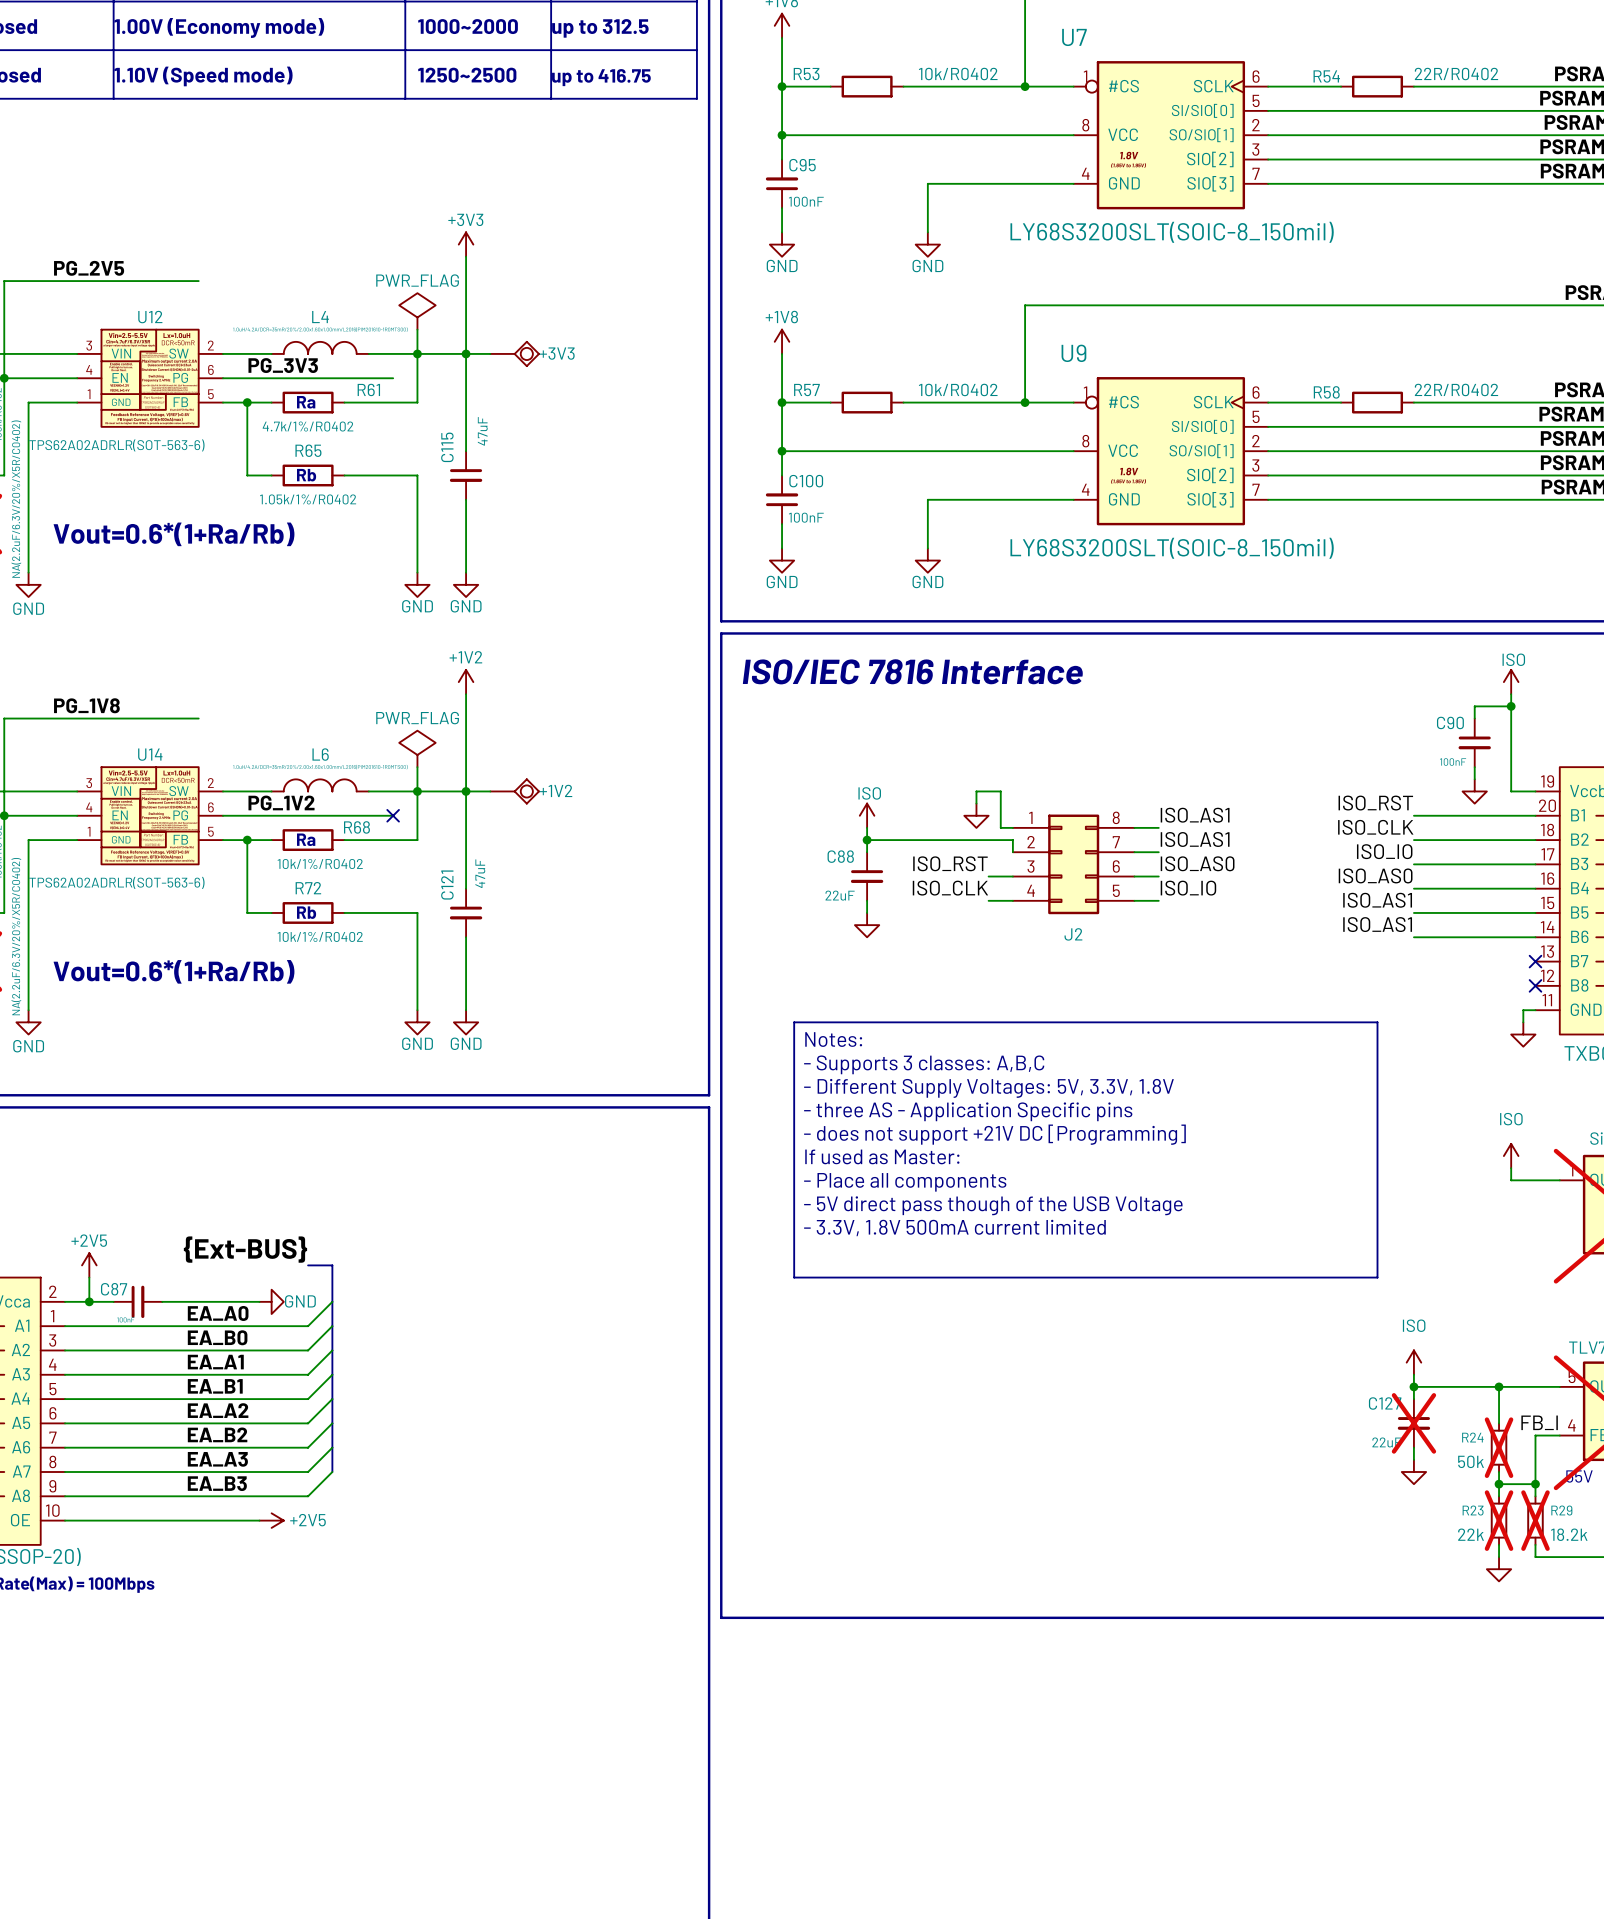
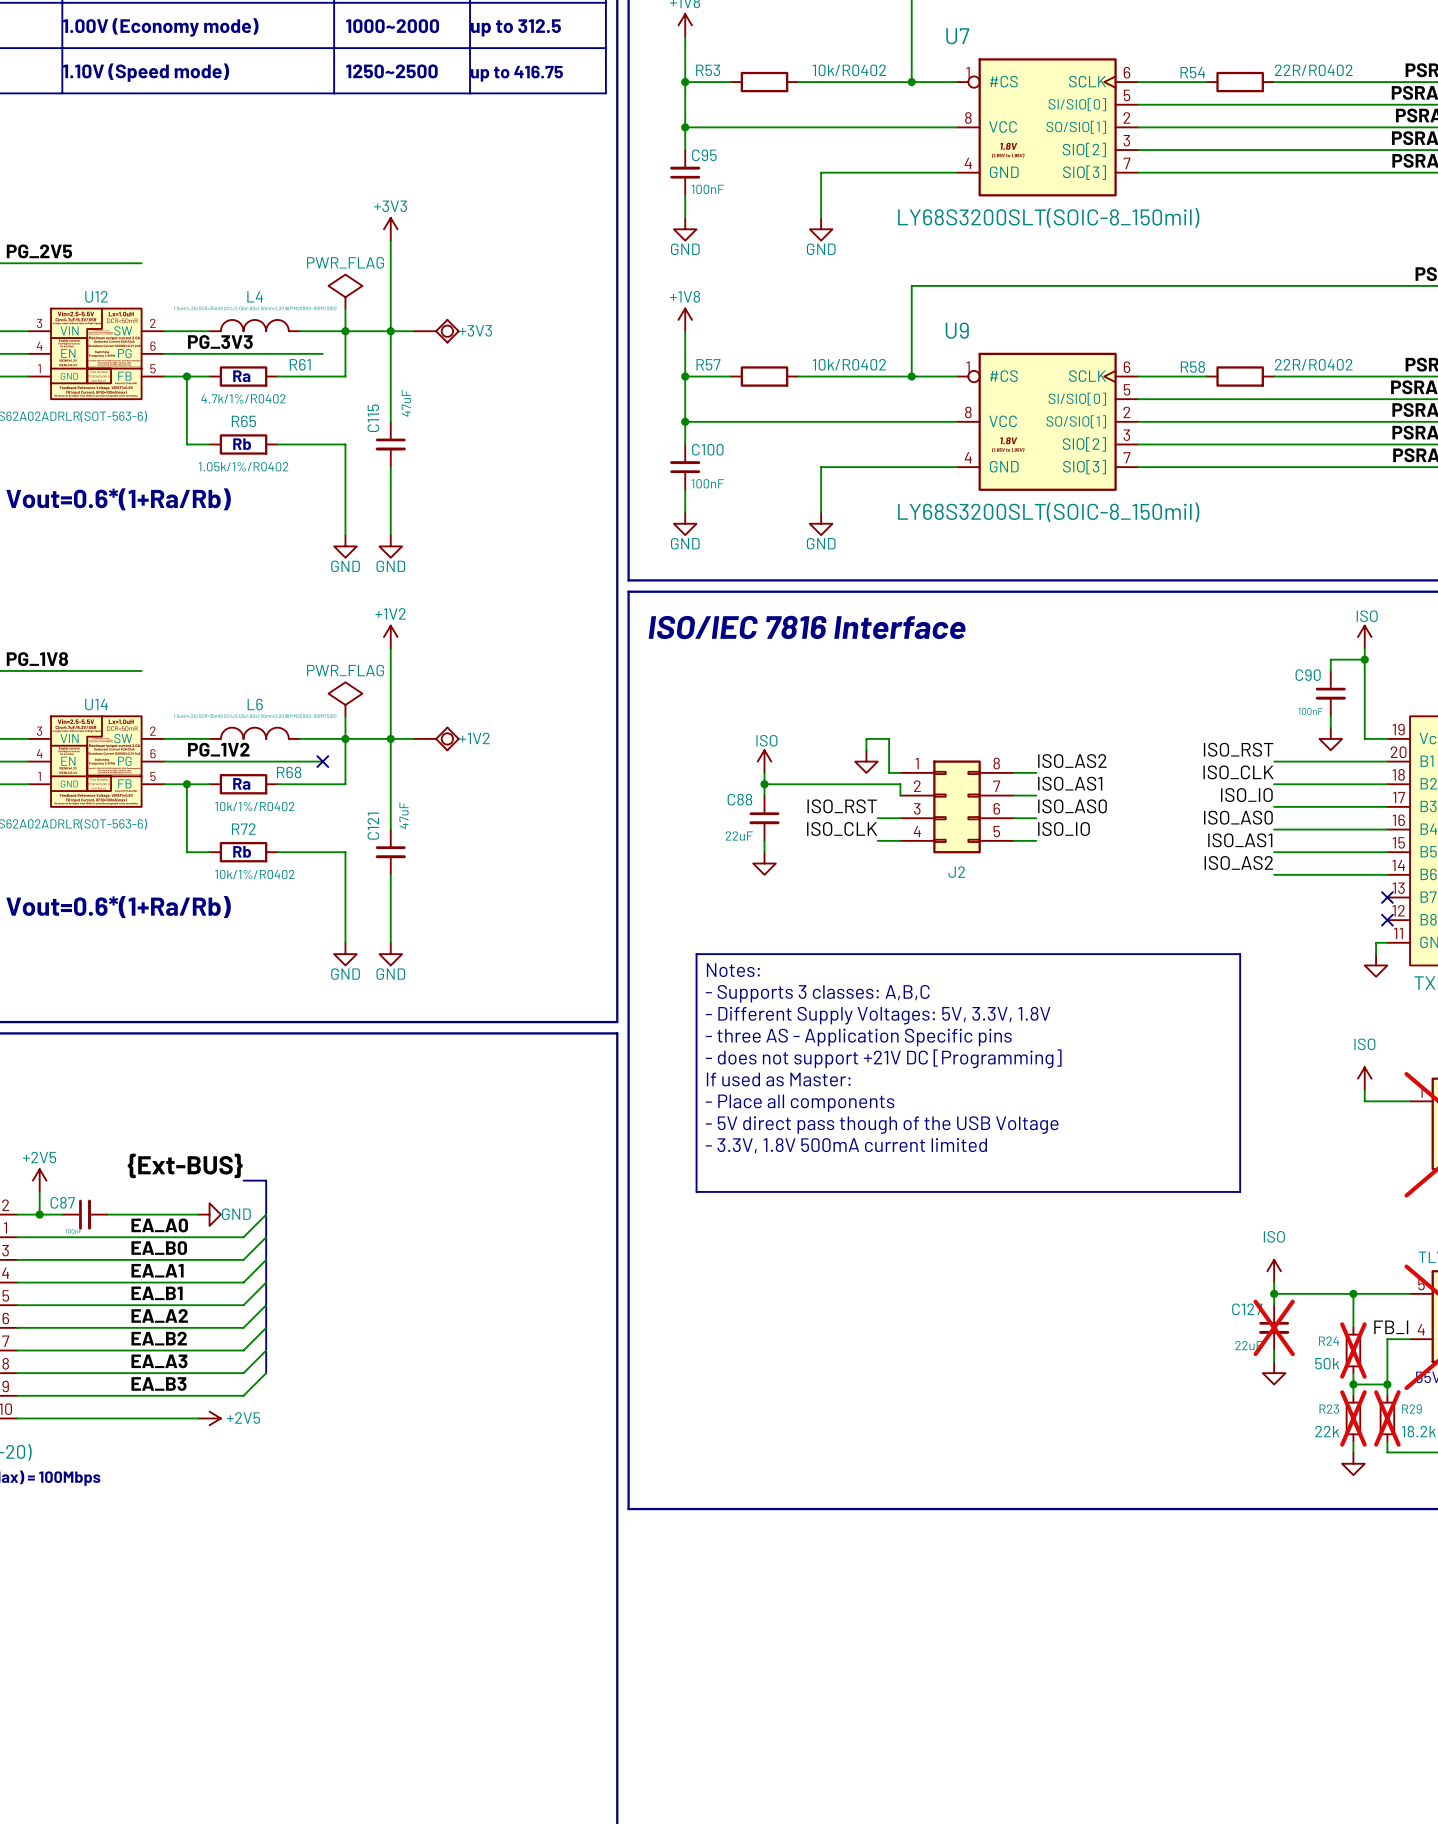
label: ISO_AS1 (1195, 815) -> ISO_AS2 (1072, 761)
label: ISO_AS1 (1377, 924) -> ISO_AS2 (1238, 862)

